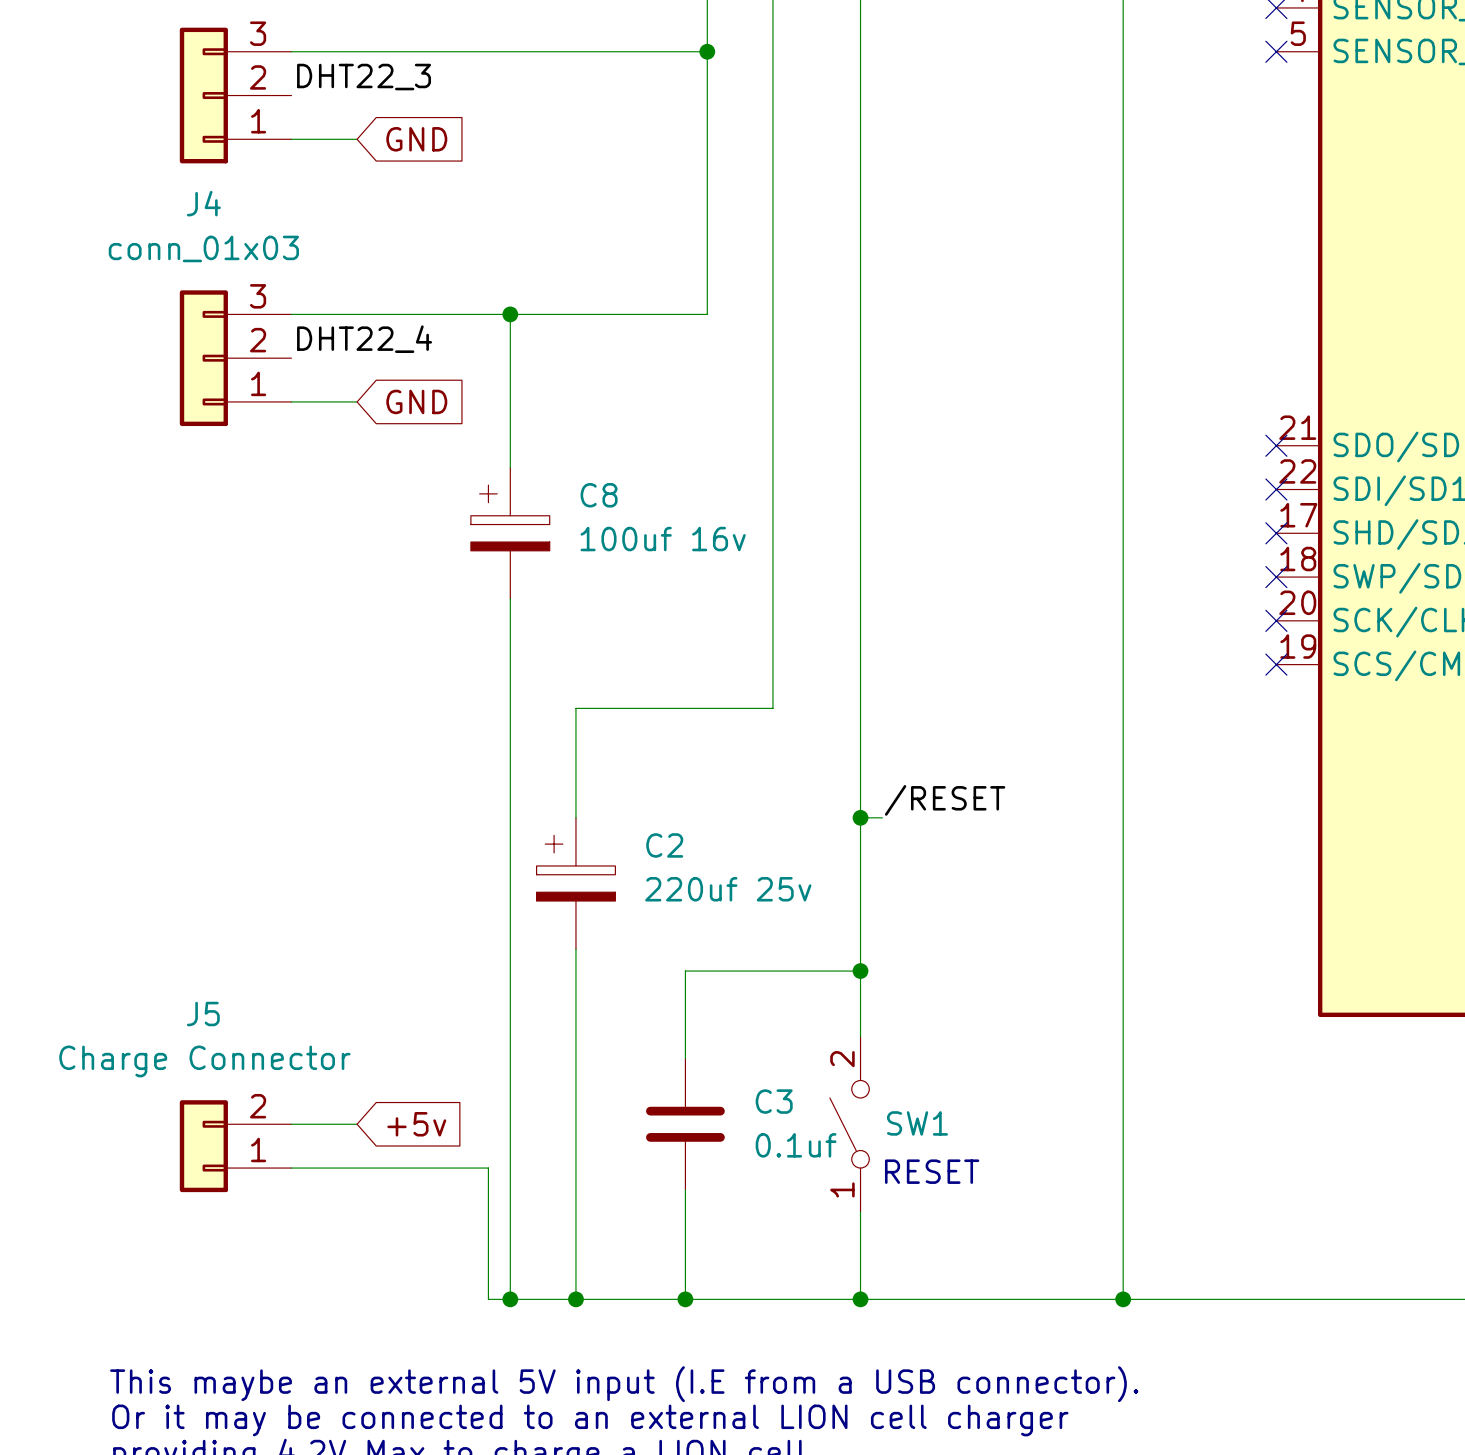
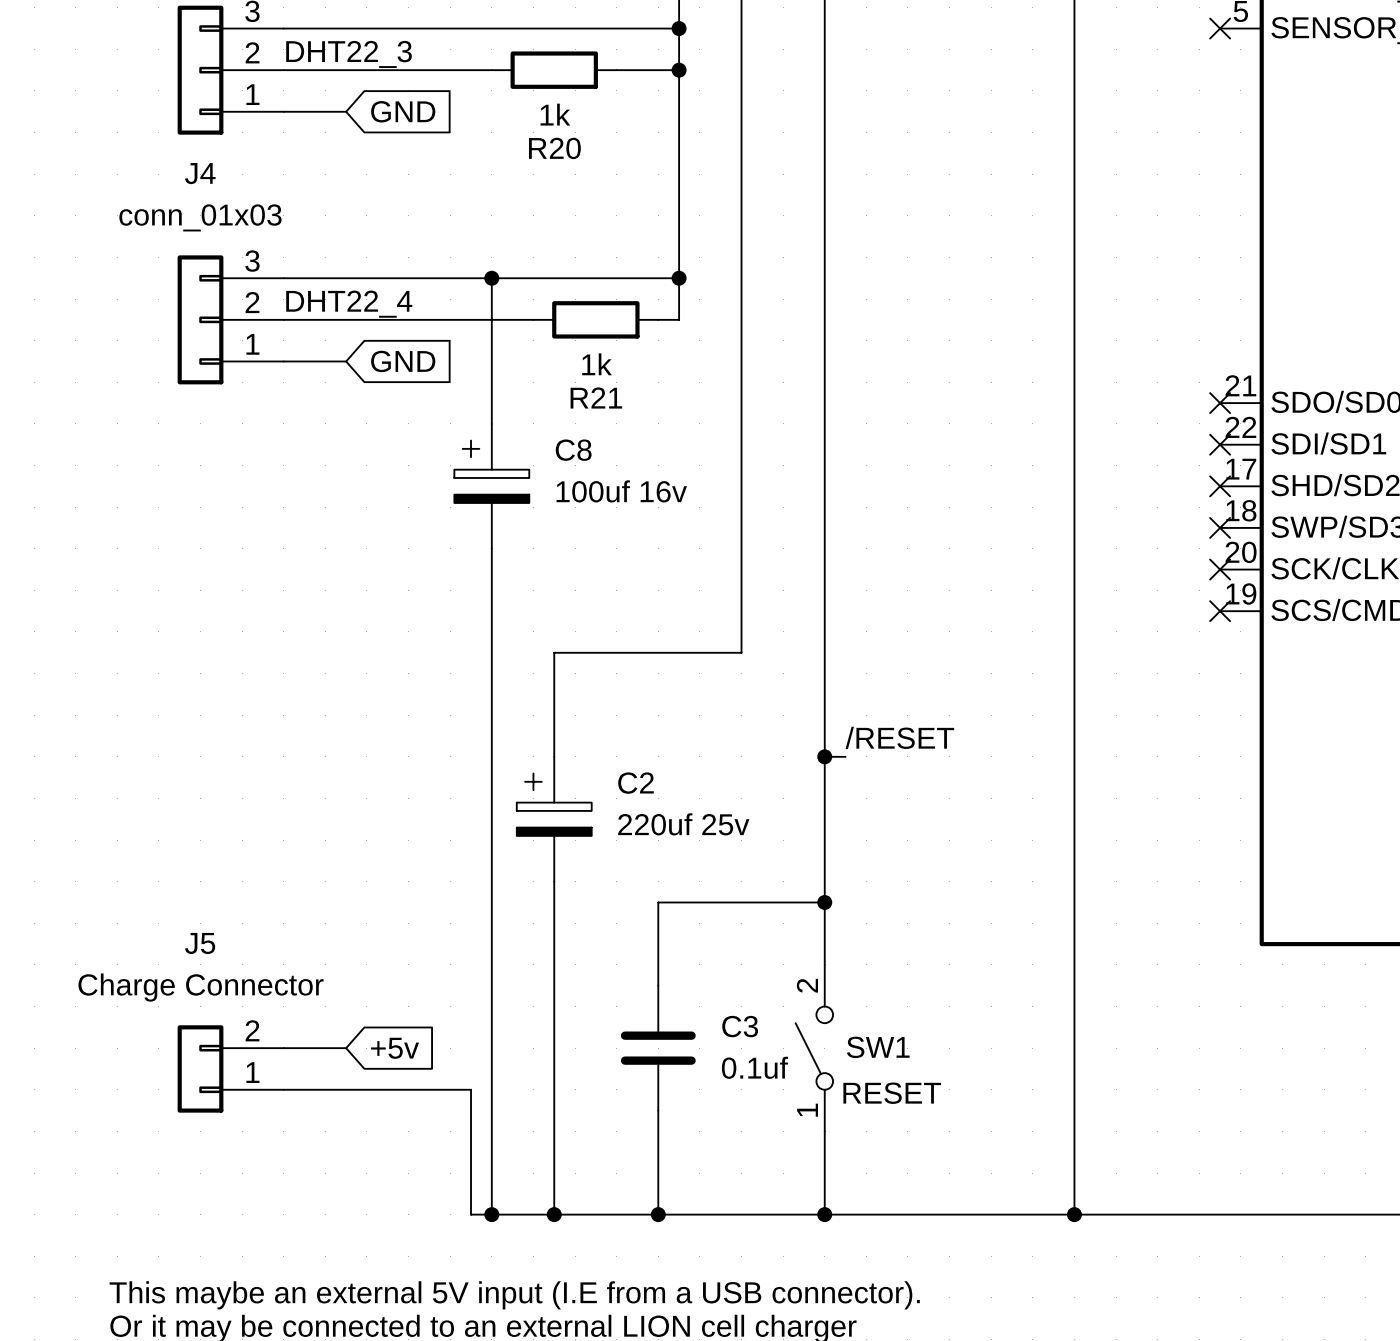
wire: none -> (283, 70) (491, 70)
R20: none -> 1k (554, 70)
wire: none -> (616, 70) (679, 70)
junction: none -> (679, 70)
wire: none -> (679, 278) (679, 319) (658, 319)
junction: none -> (679, 278)
wire: none -> (283, 319) (533, 319)
R21: none -> 1k (595, 319)

